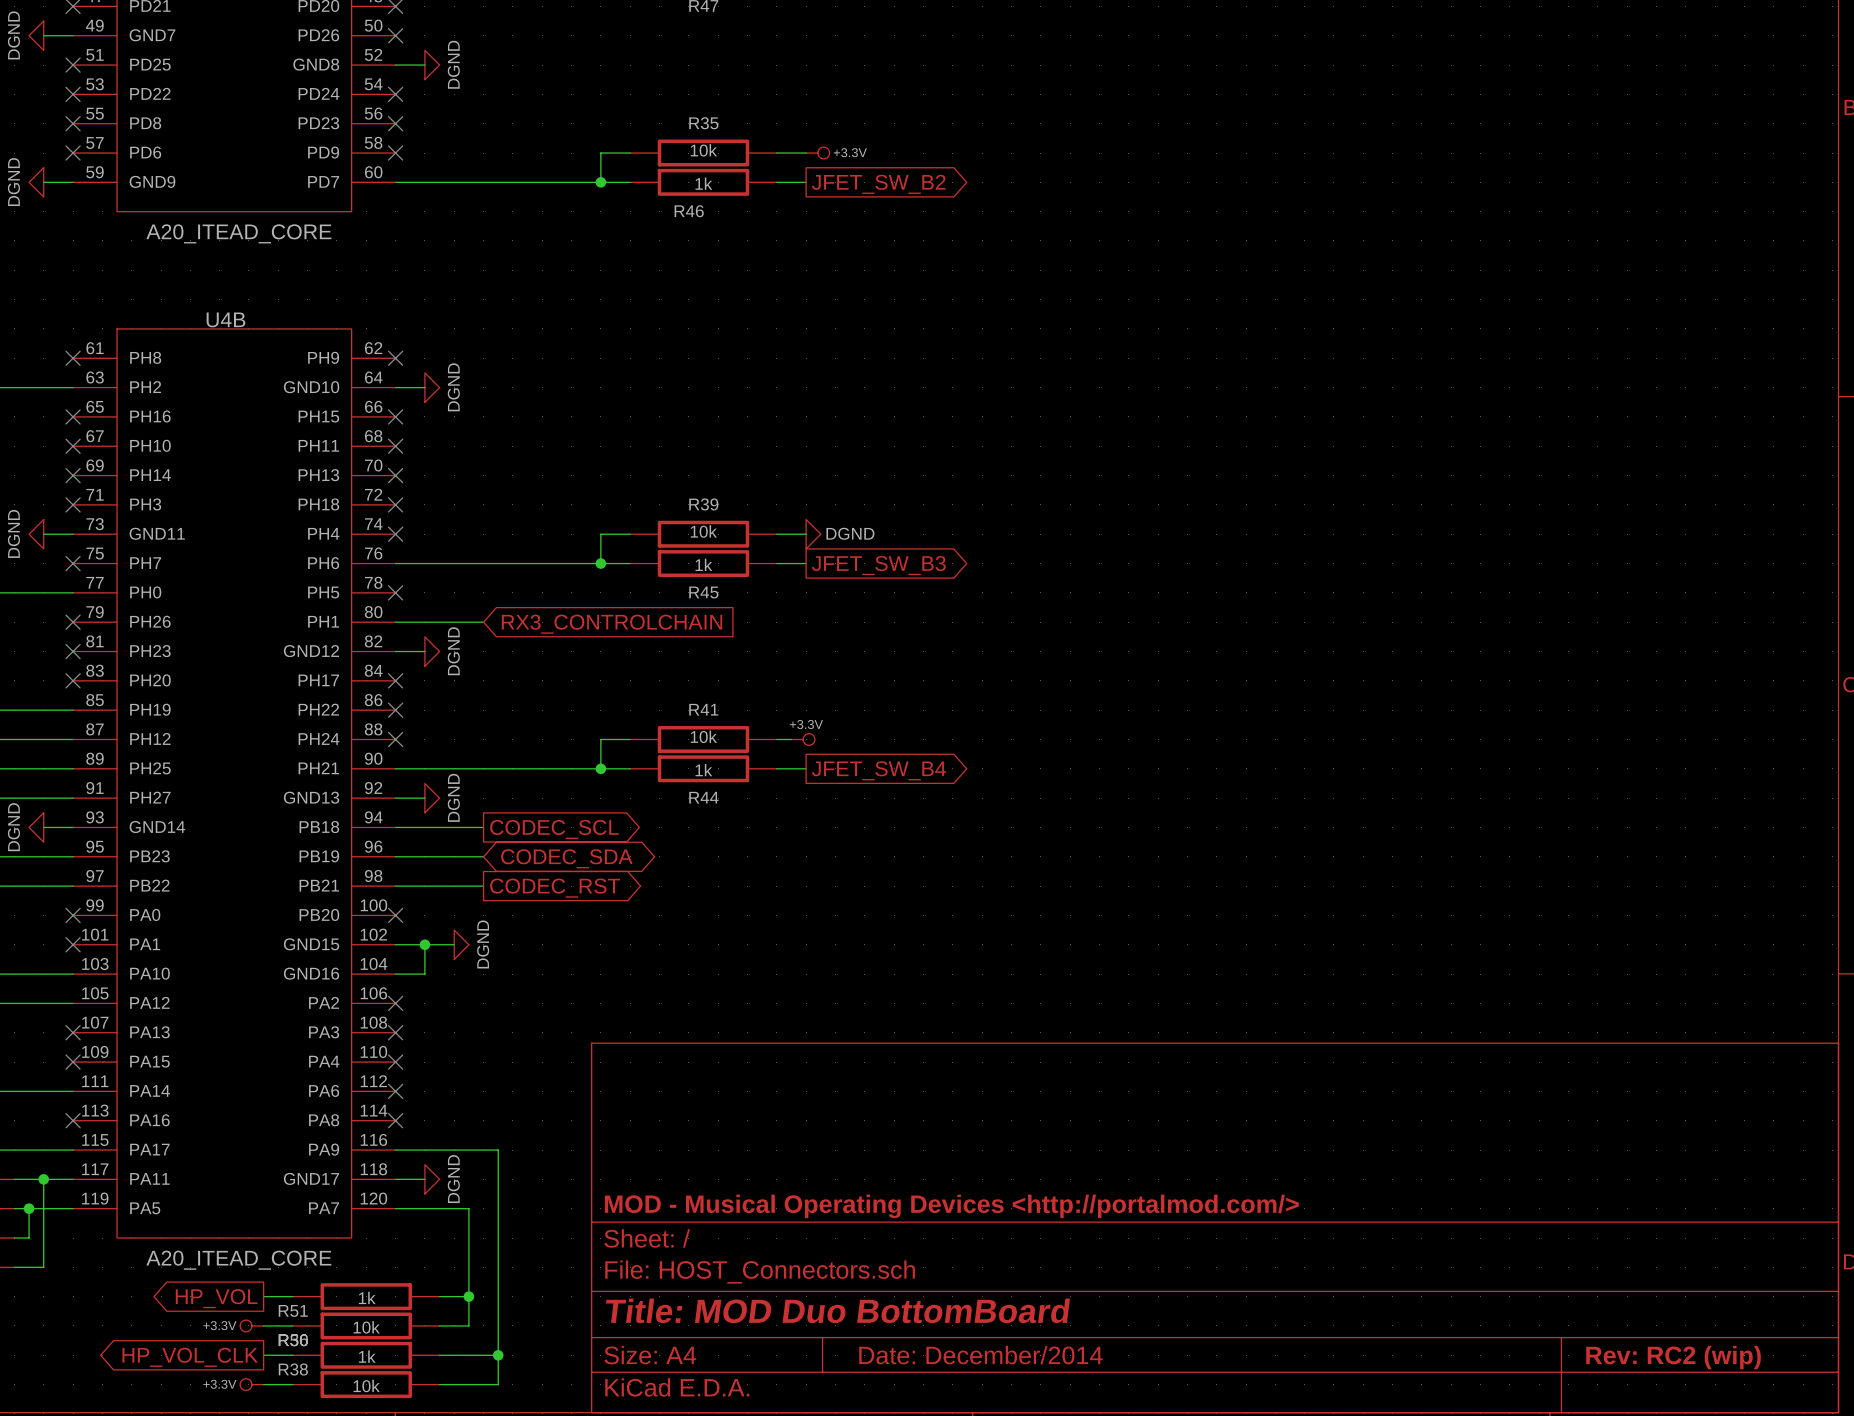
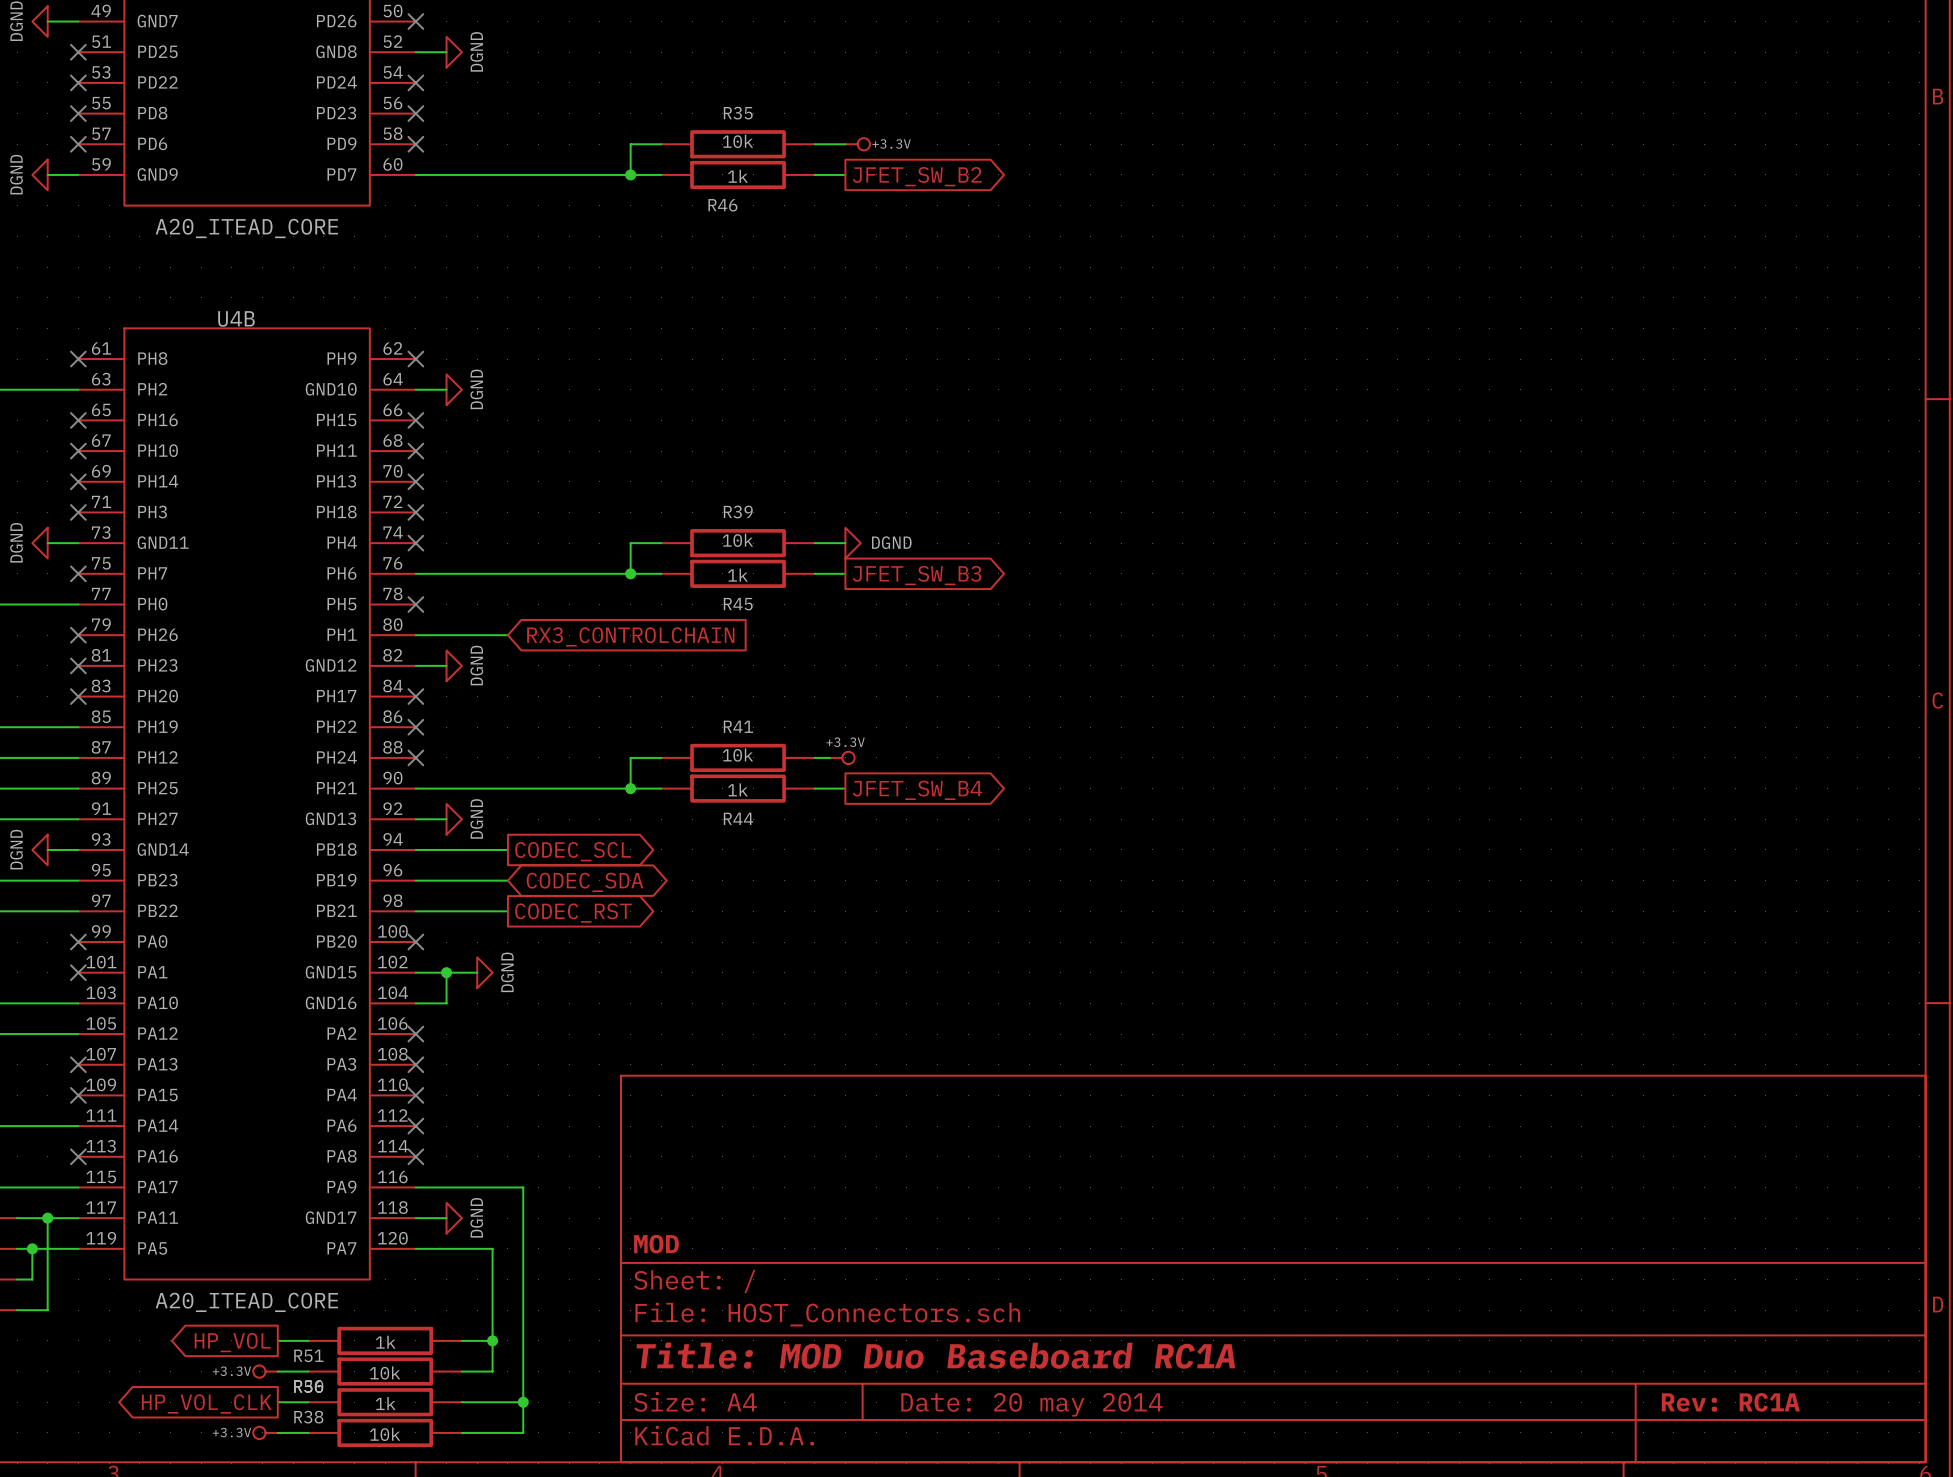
title block: MOD - Musical Operating Devices <http://portalmod.com/> (951, 1206) -> MOD (656, 1244)
title block: Title: MOD Duo BottomBoard (838, 1310) -> Title: MOD Duo Baseboard RC1A (935, 1355)
title block: Date: December/2014 (980, 1355) -> Date: 20 may 2014 (1031, 1404)
title block: Rev: RC2 (wip) (1673, 1357) -> Rev: RC1A (1730, 1402)

